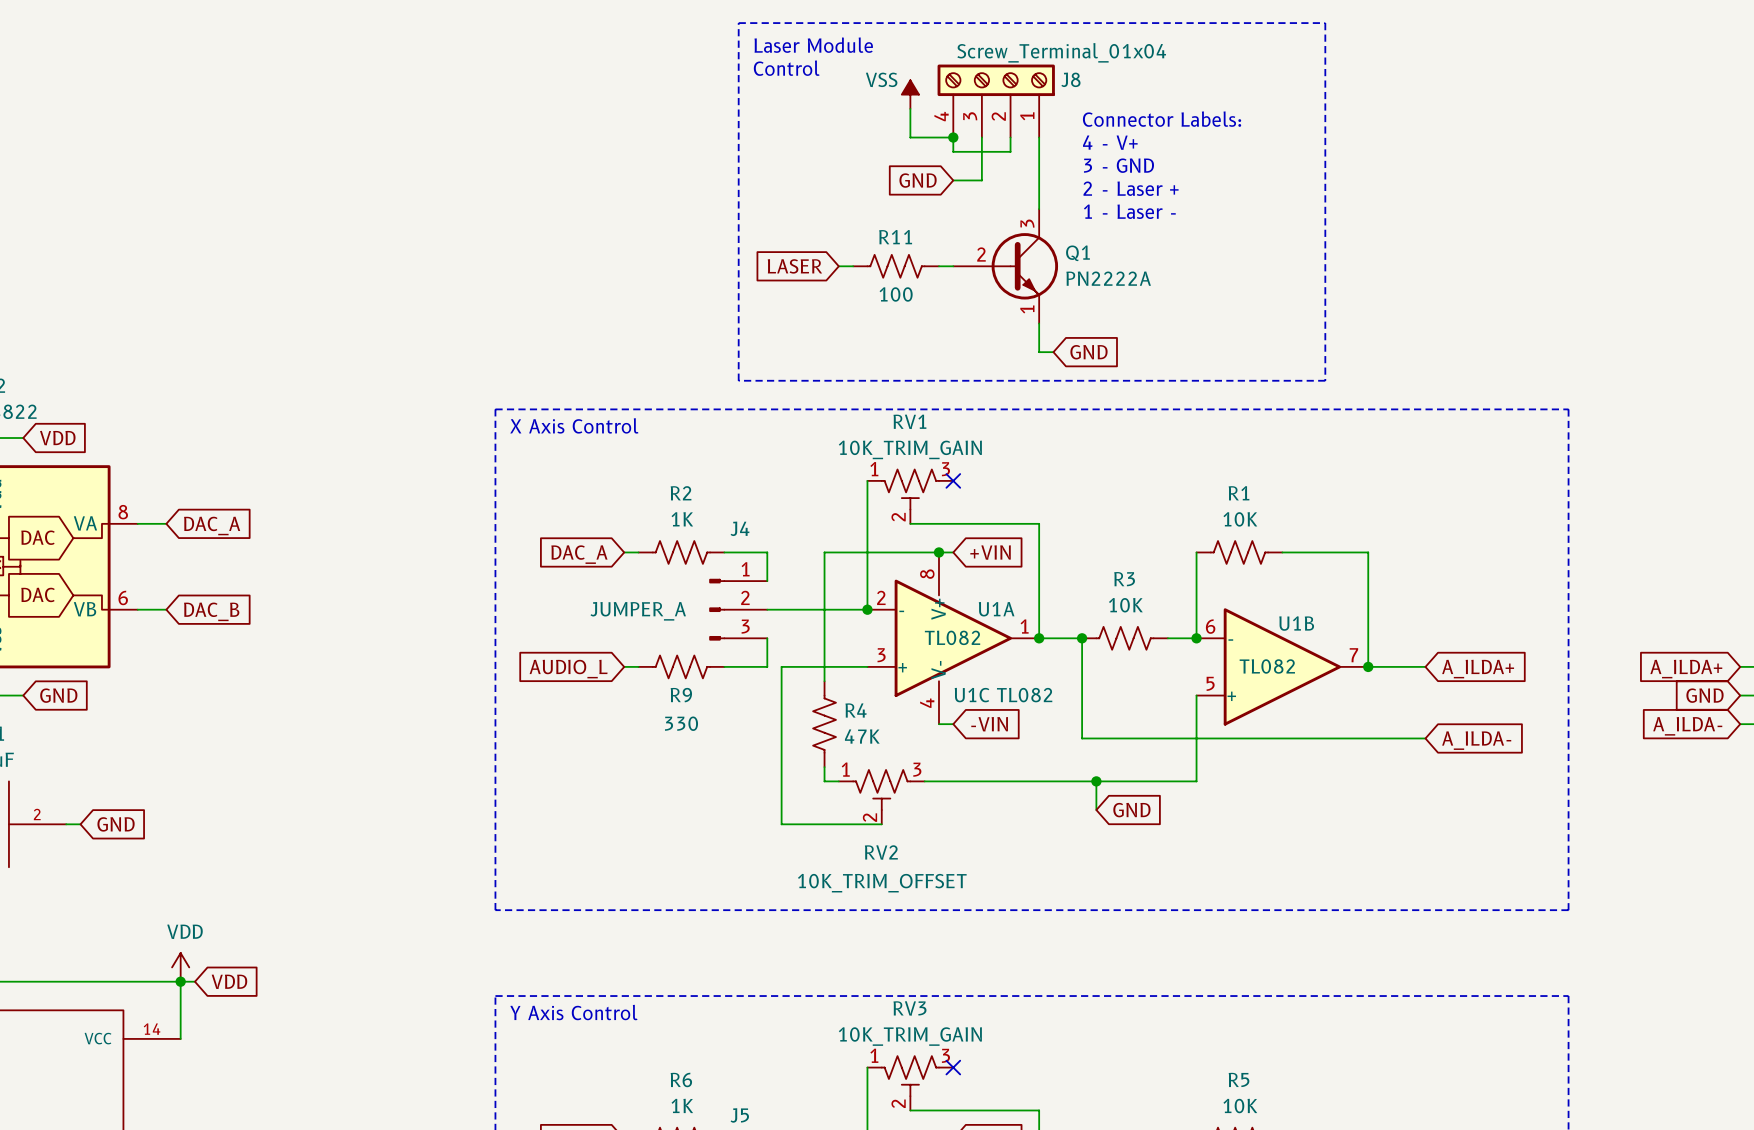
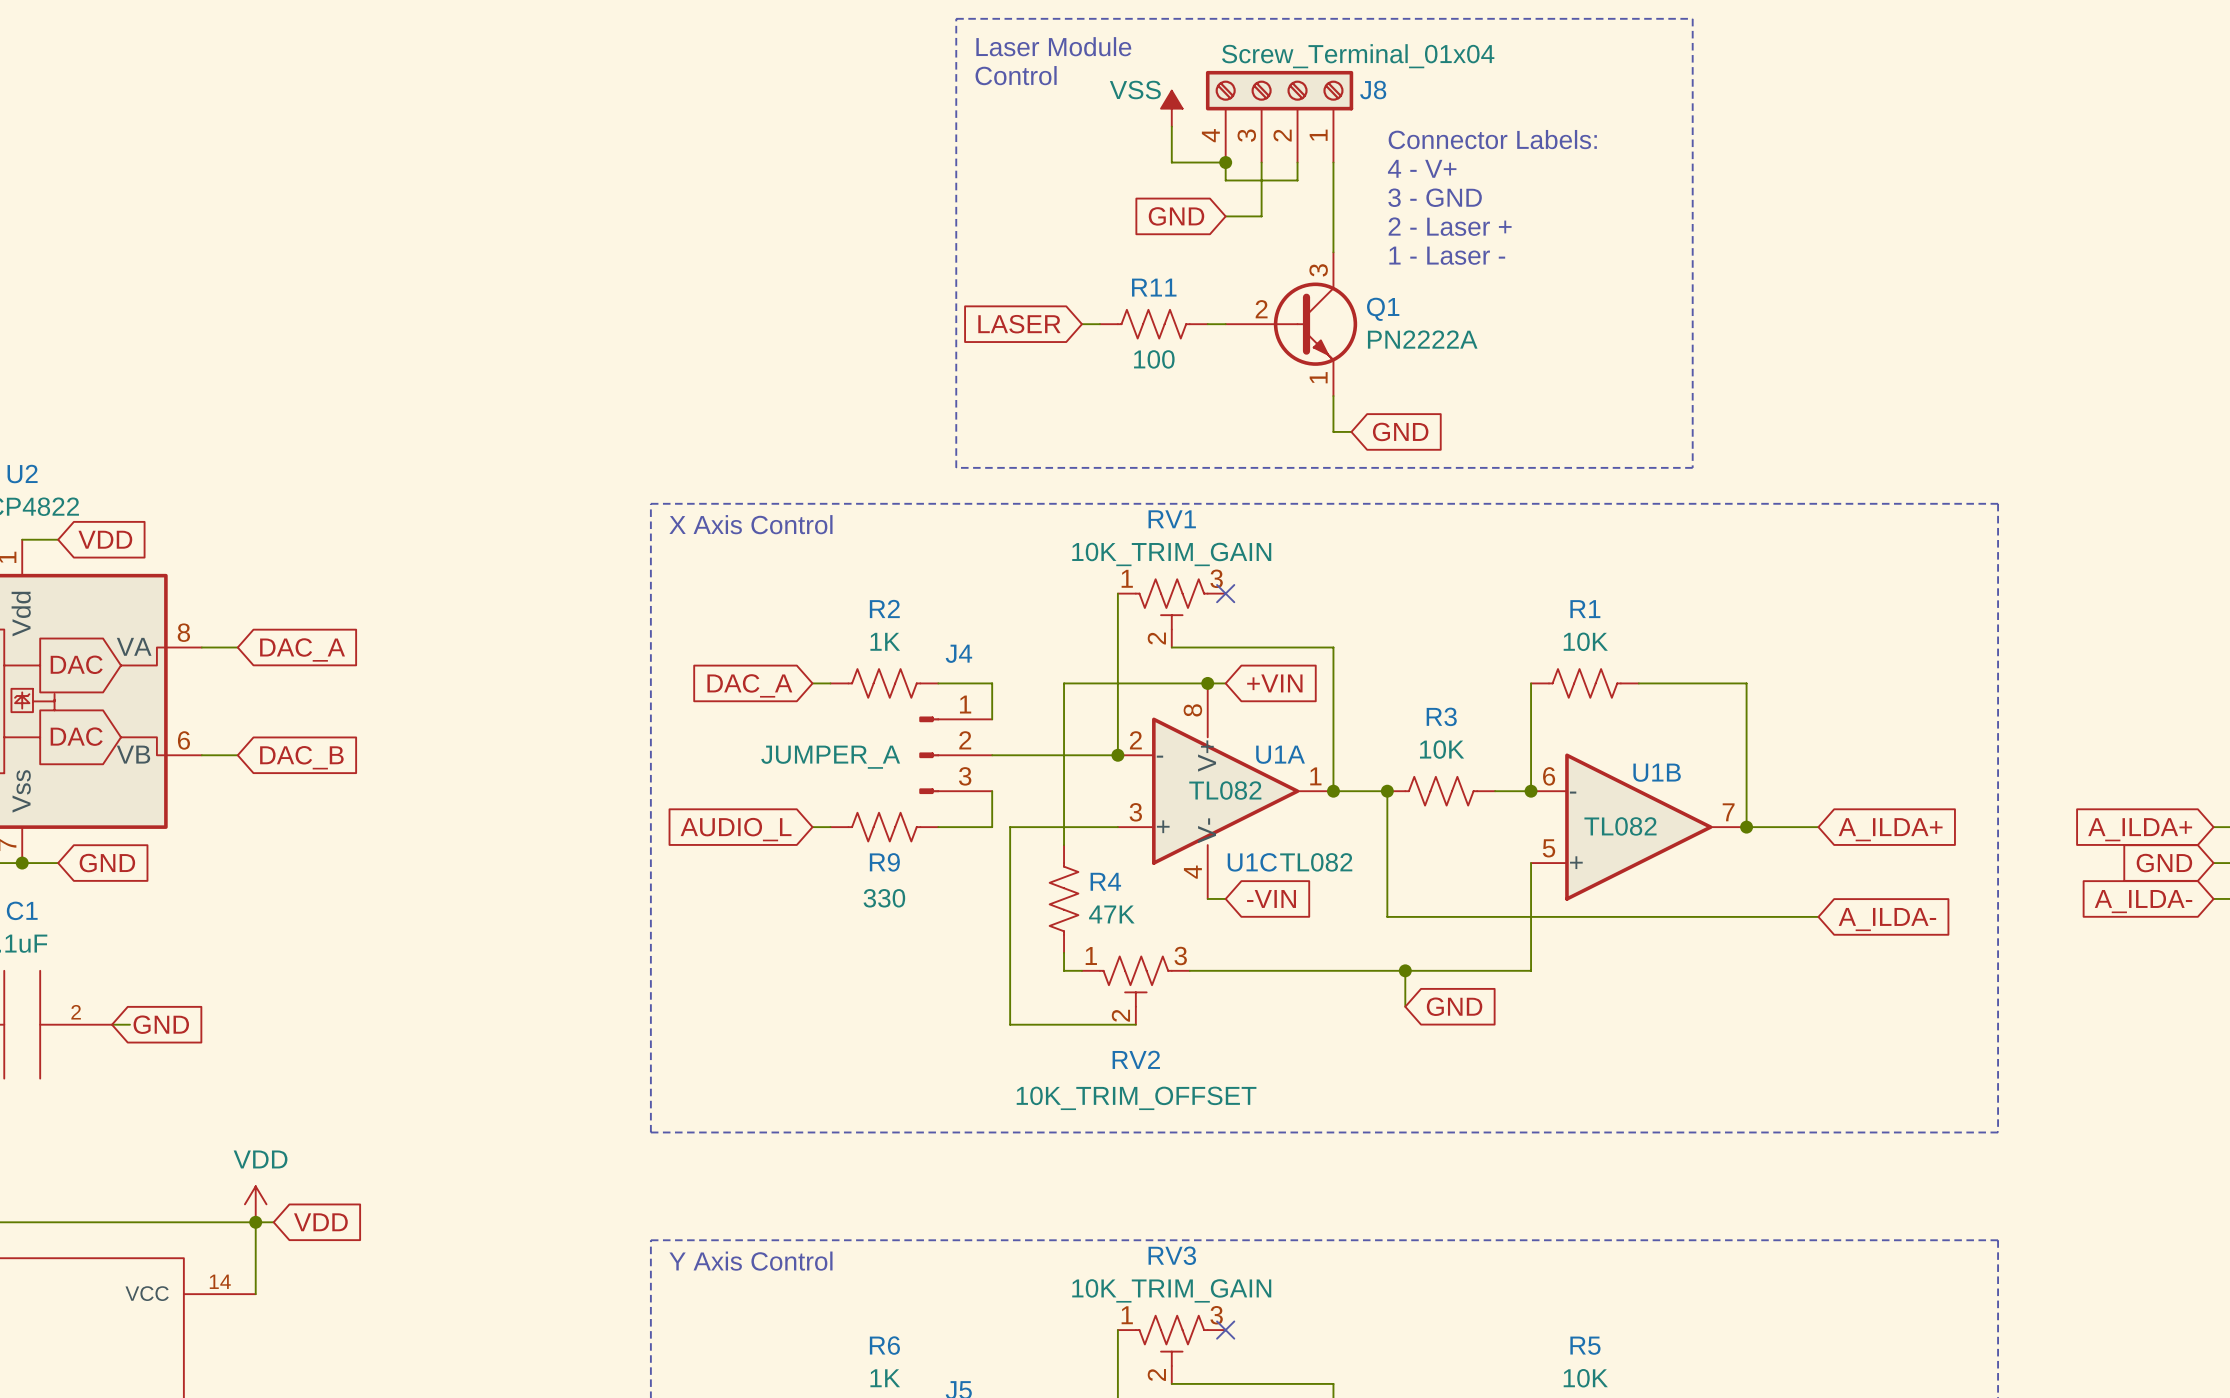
global label position: GND (116, 824) -> GND (161, 1024)

